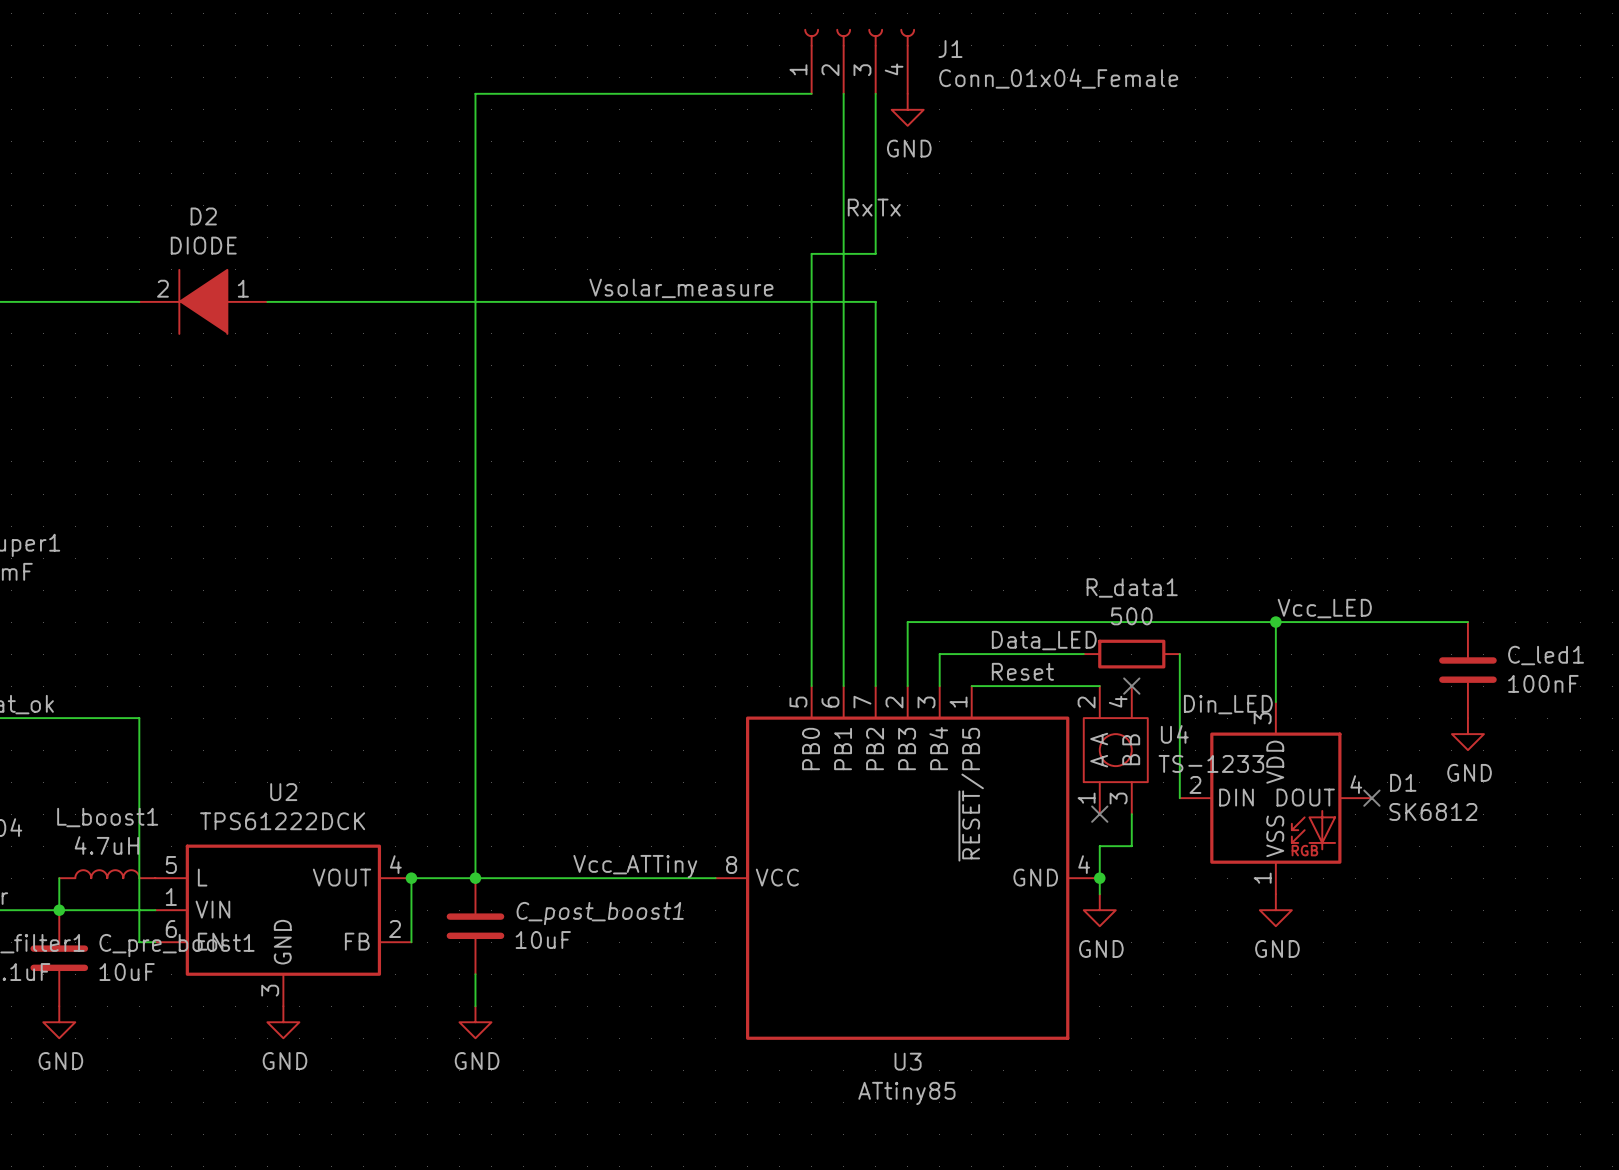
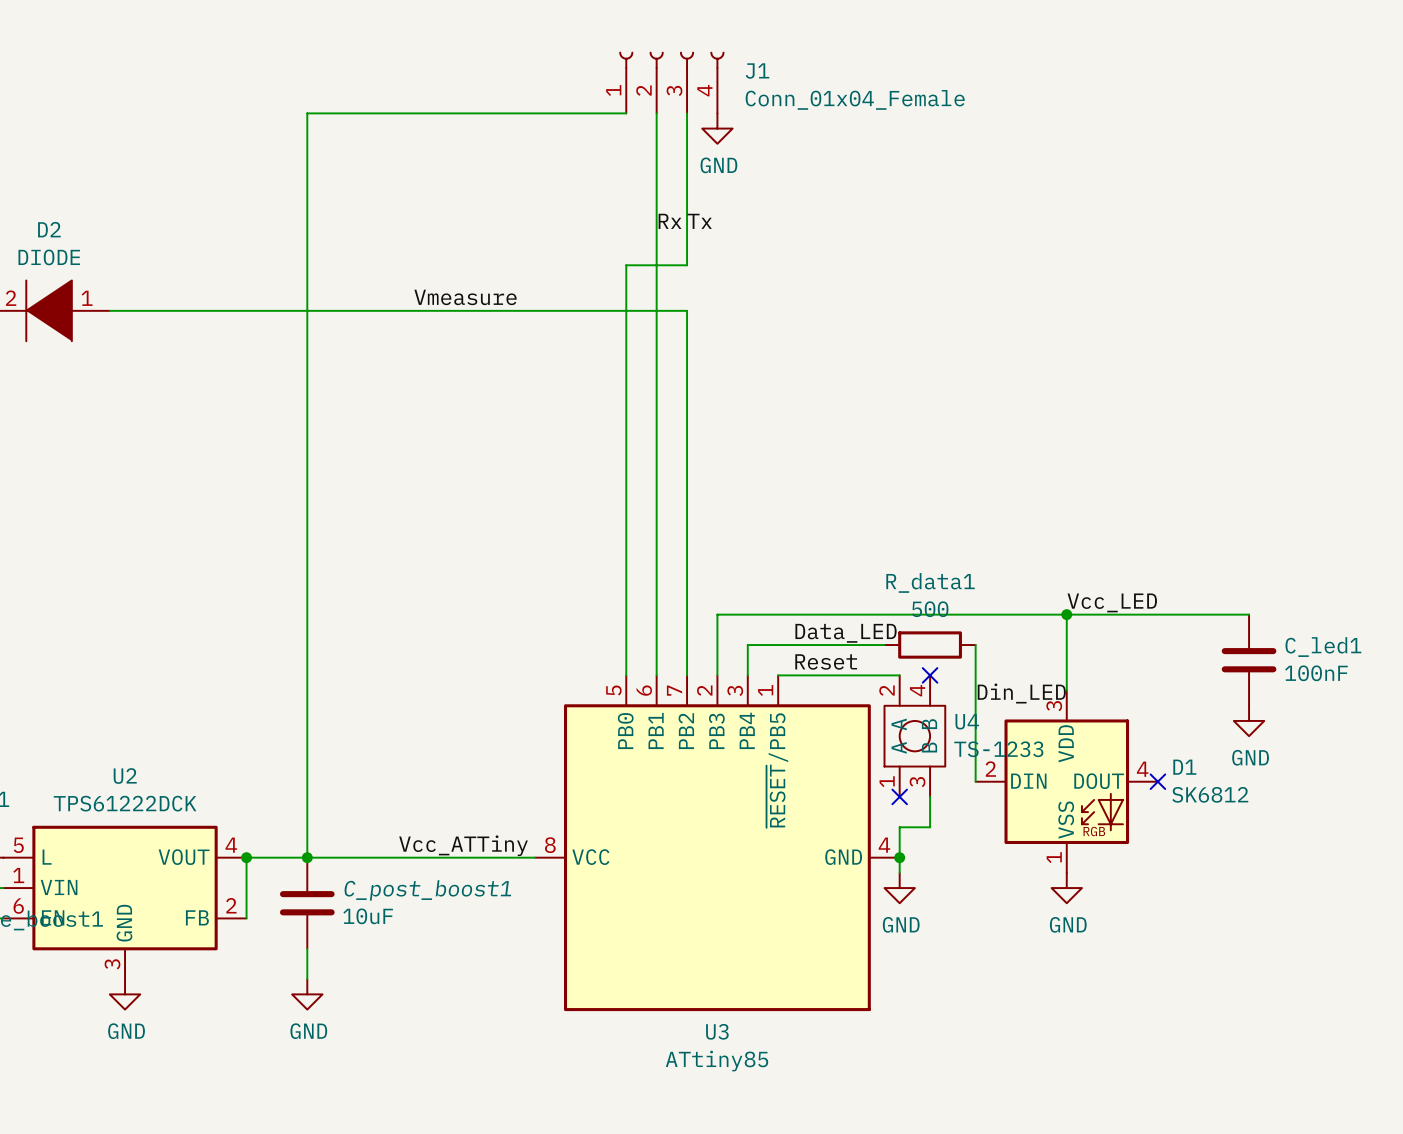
label: Vsolar_measure (681, 288) -> Vmeasure (465, 297)

